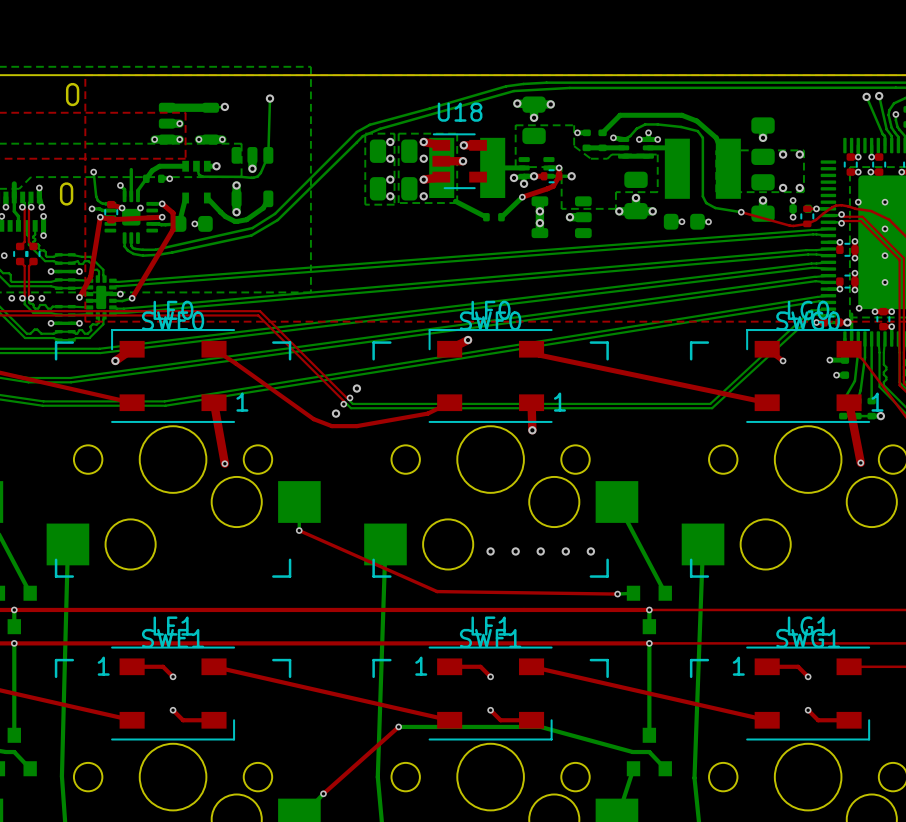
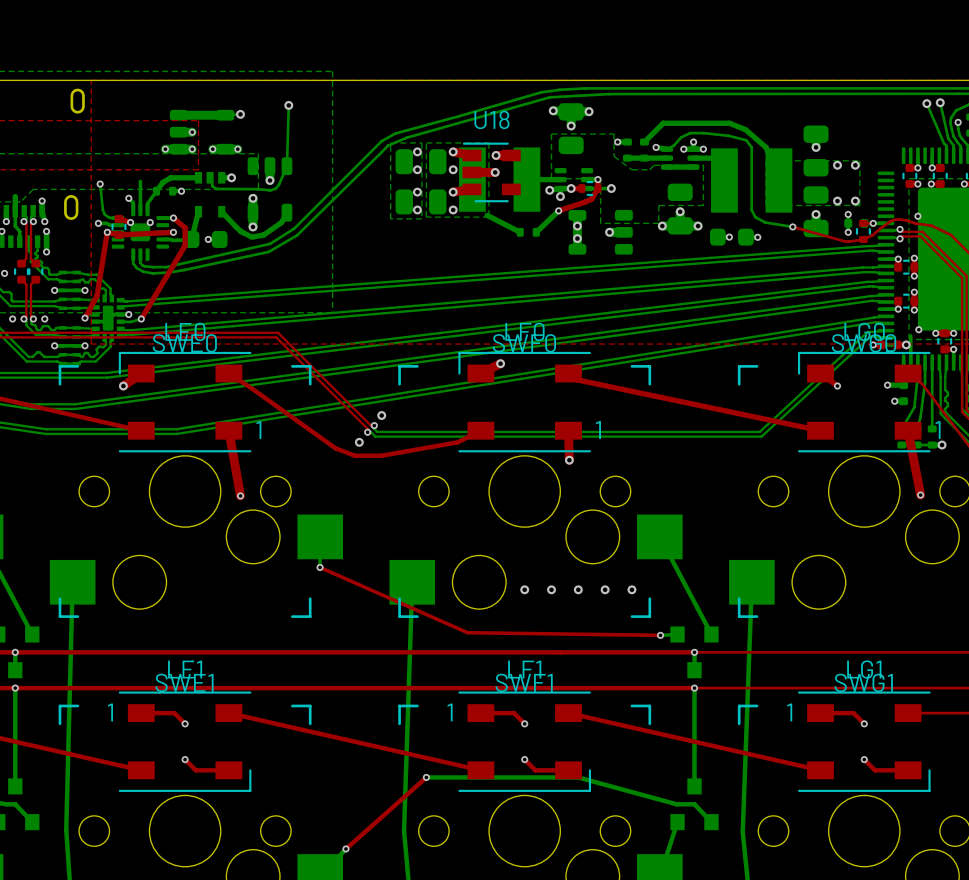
via: (885, 202) -> none
via: (885, 228) -> none
via: (885, 255) -> none
via: (885, 282) -> none

